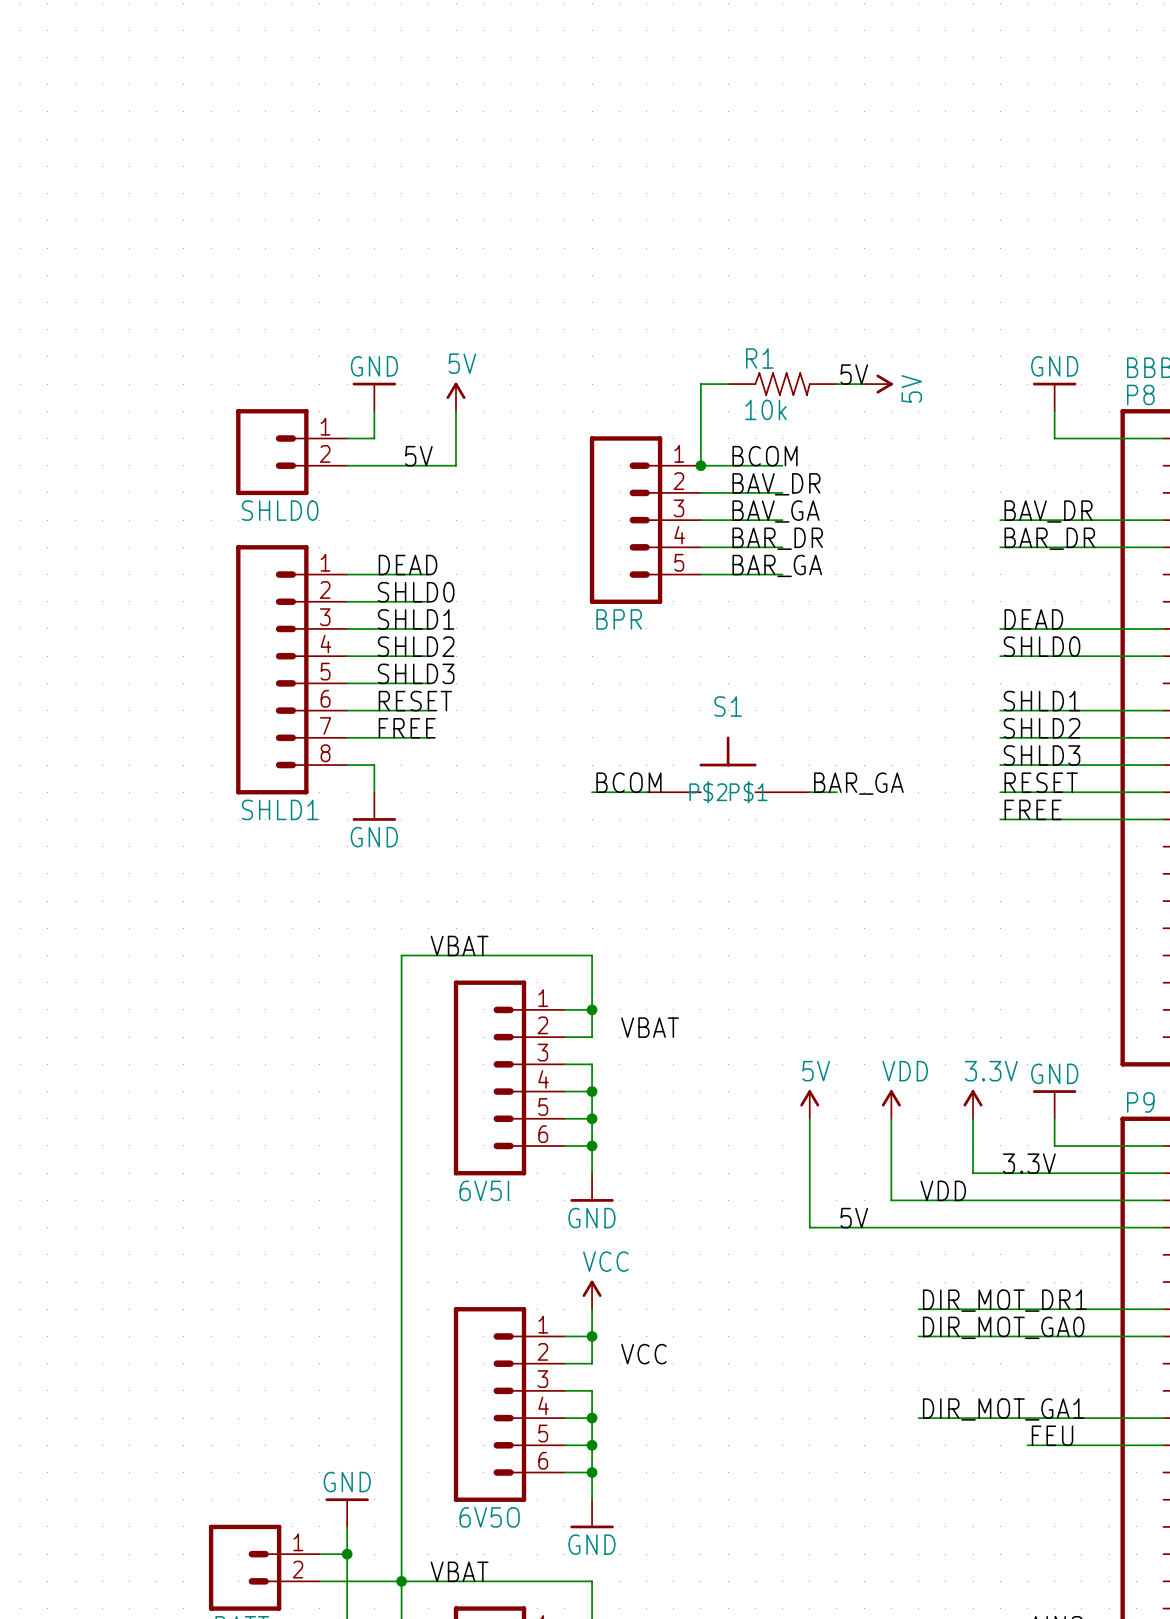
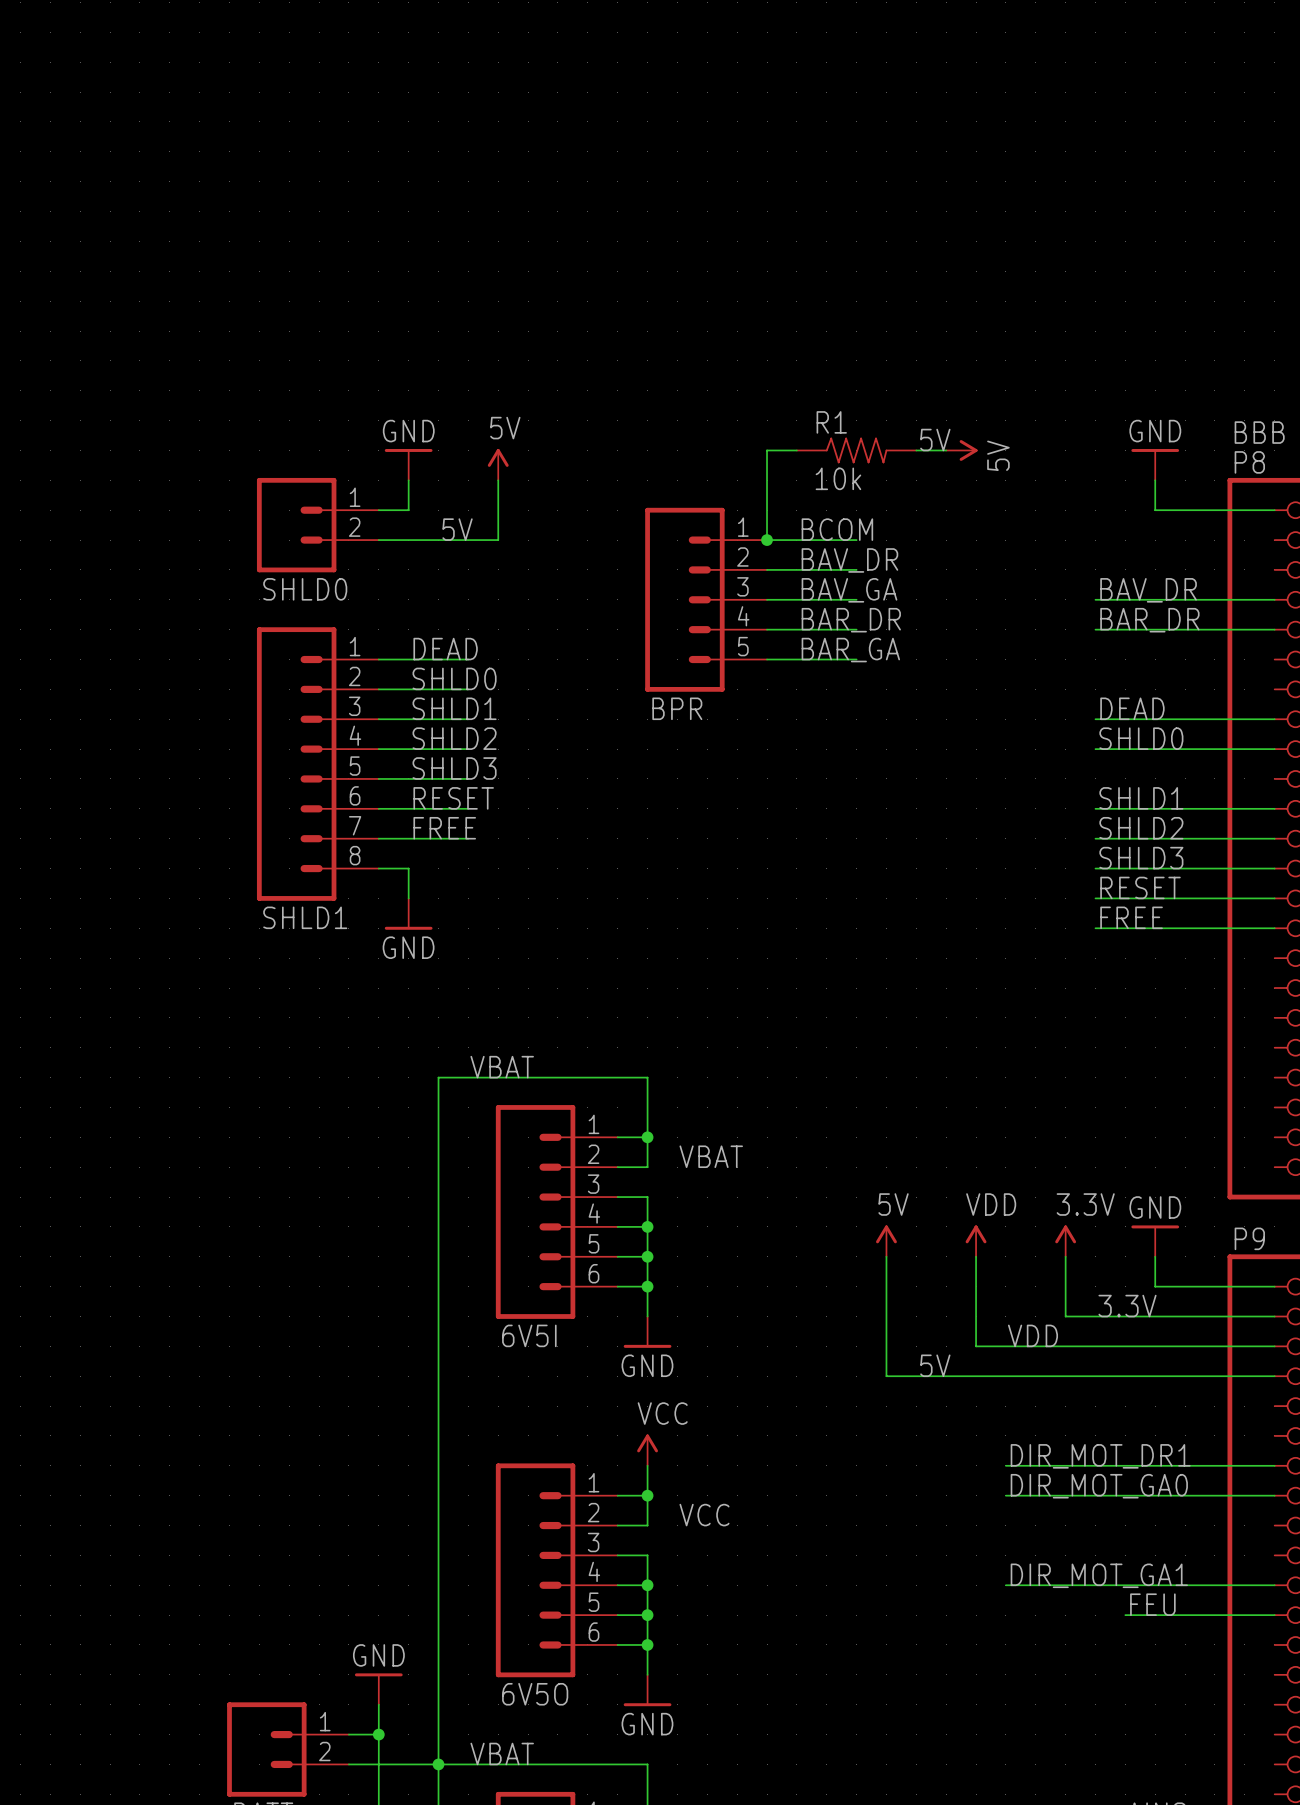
S1: (728, 764) -> none
label: BCOM (628, 782) -> none
label: BAR_GA (858, 783) -> none
wire: (592, 792) (646, 792) -> none
wire: (809, 792) (836, 792) -> none

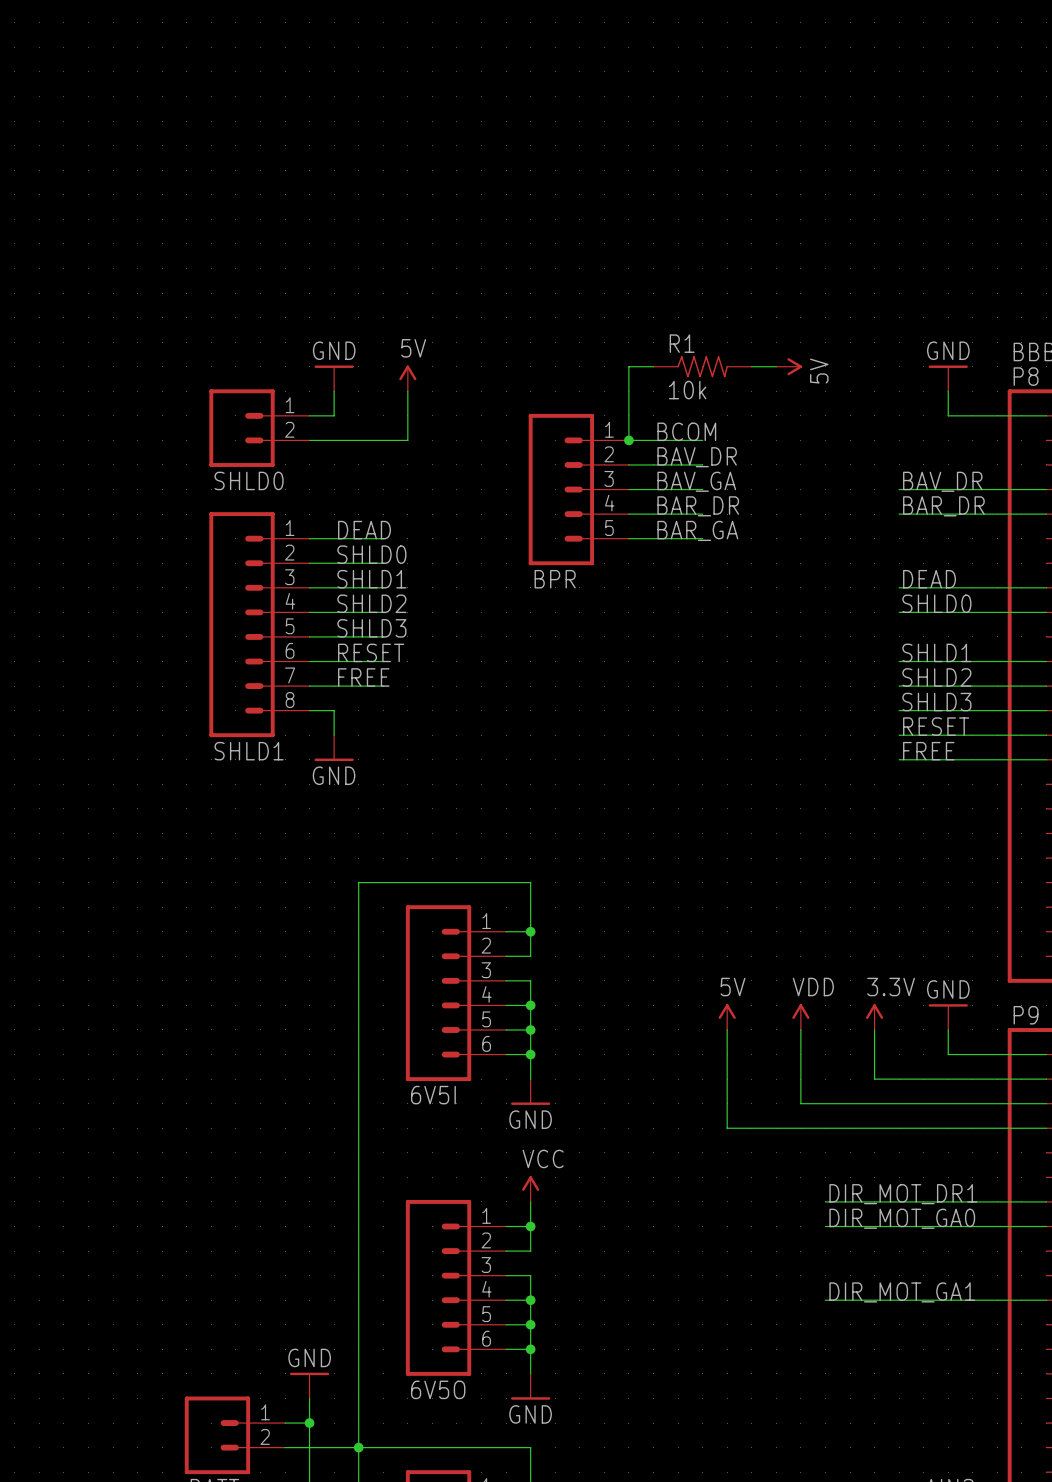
label: 5V (935, 440) -> none
label: 5V (457, 529) -> none
label: VBAT (502, 1067) -> none
label: VBAT (711, 1156) -> none
label: 3.3V (1127, 1306) -> none
label: VDD (1032, 1335) -> none
label: 5V (935, 1365) -> none
label: VCC (704, 1515) -> none
label: FEU (1152, 1604) -> none
wire: (1125, 1615) (1274, 1615) -> none
label: VBAT (502, 1753) -> none

